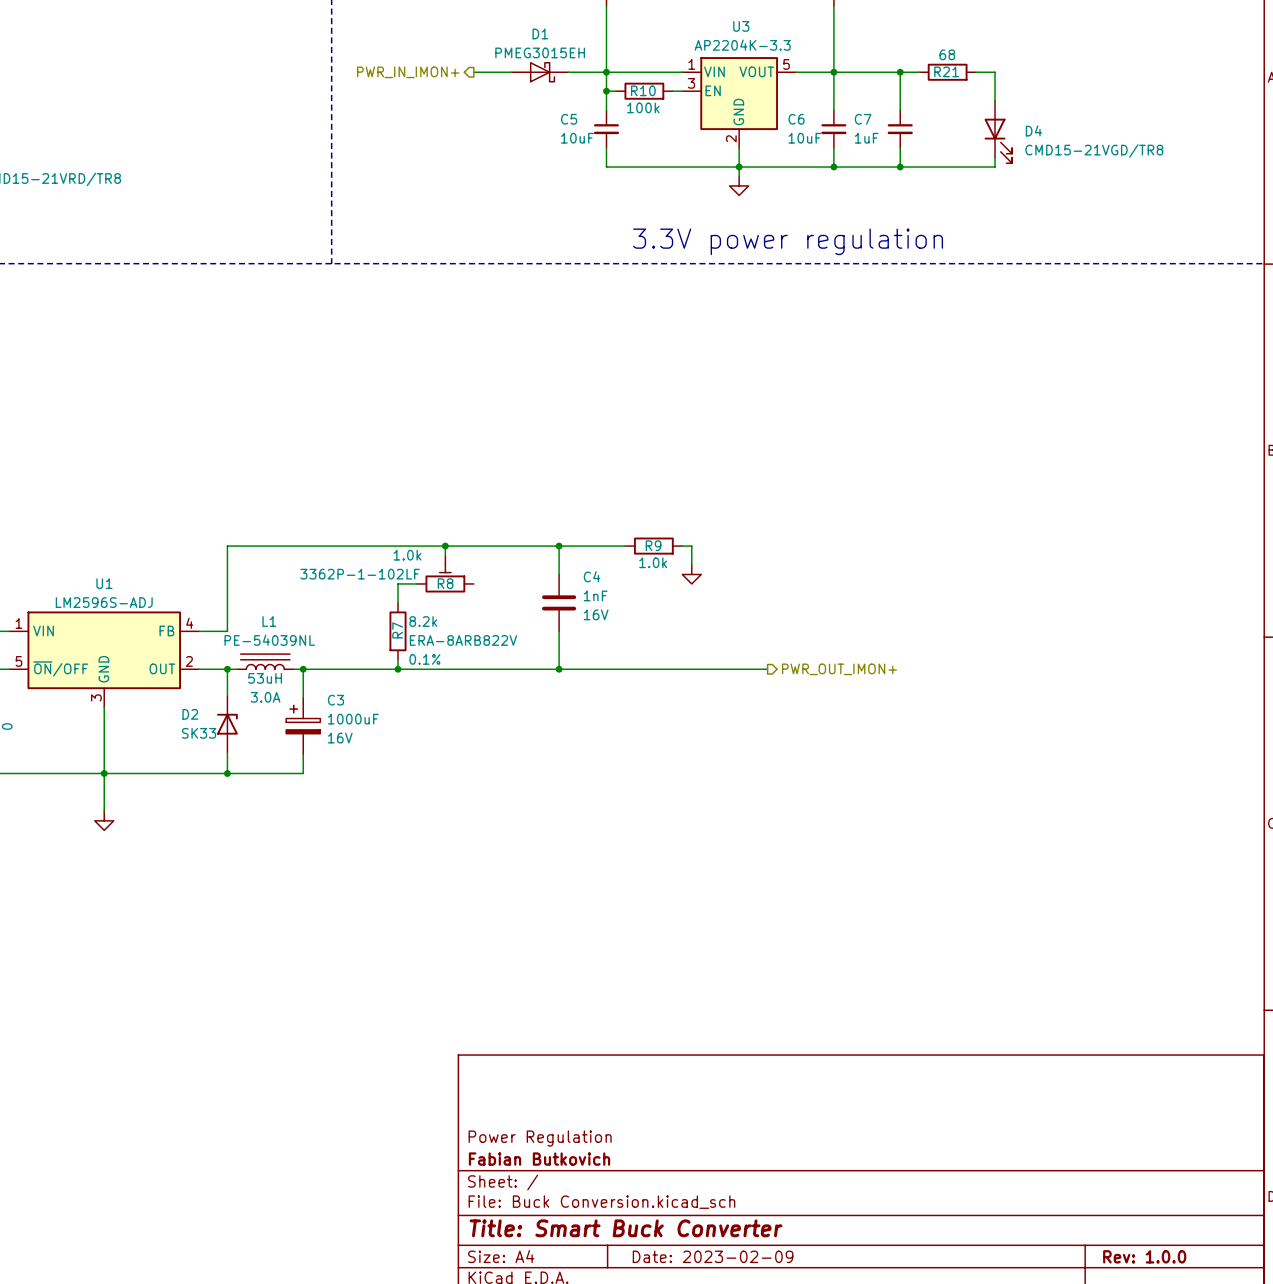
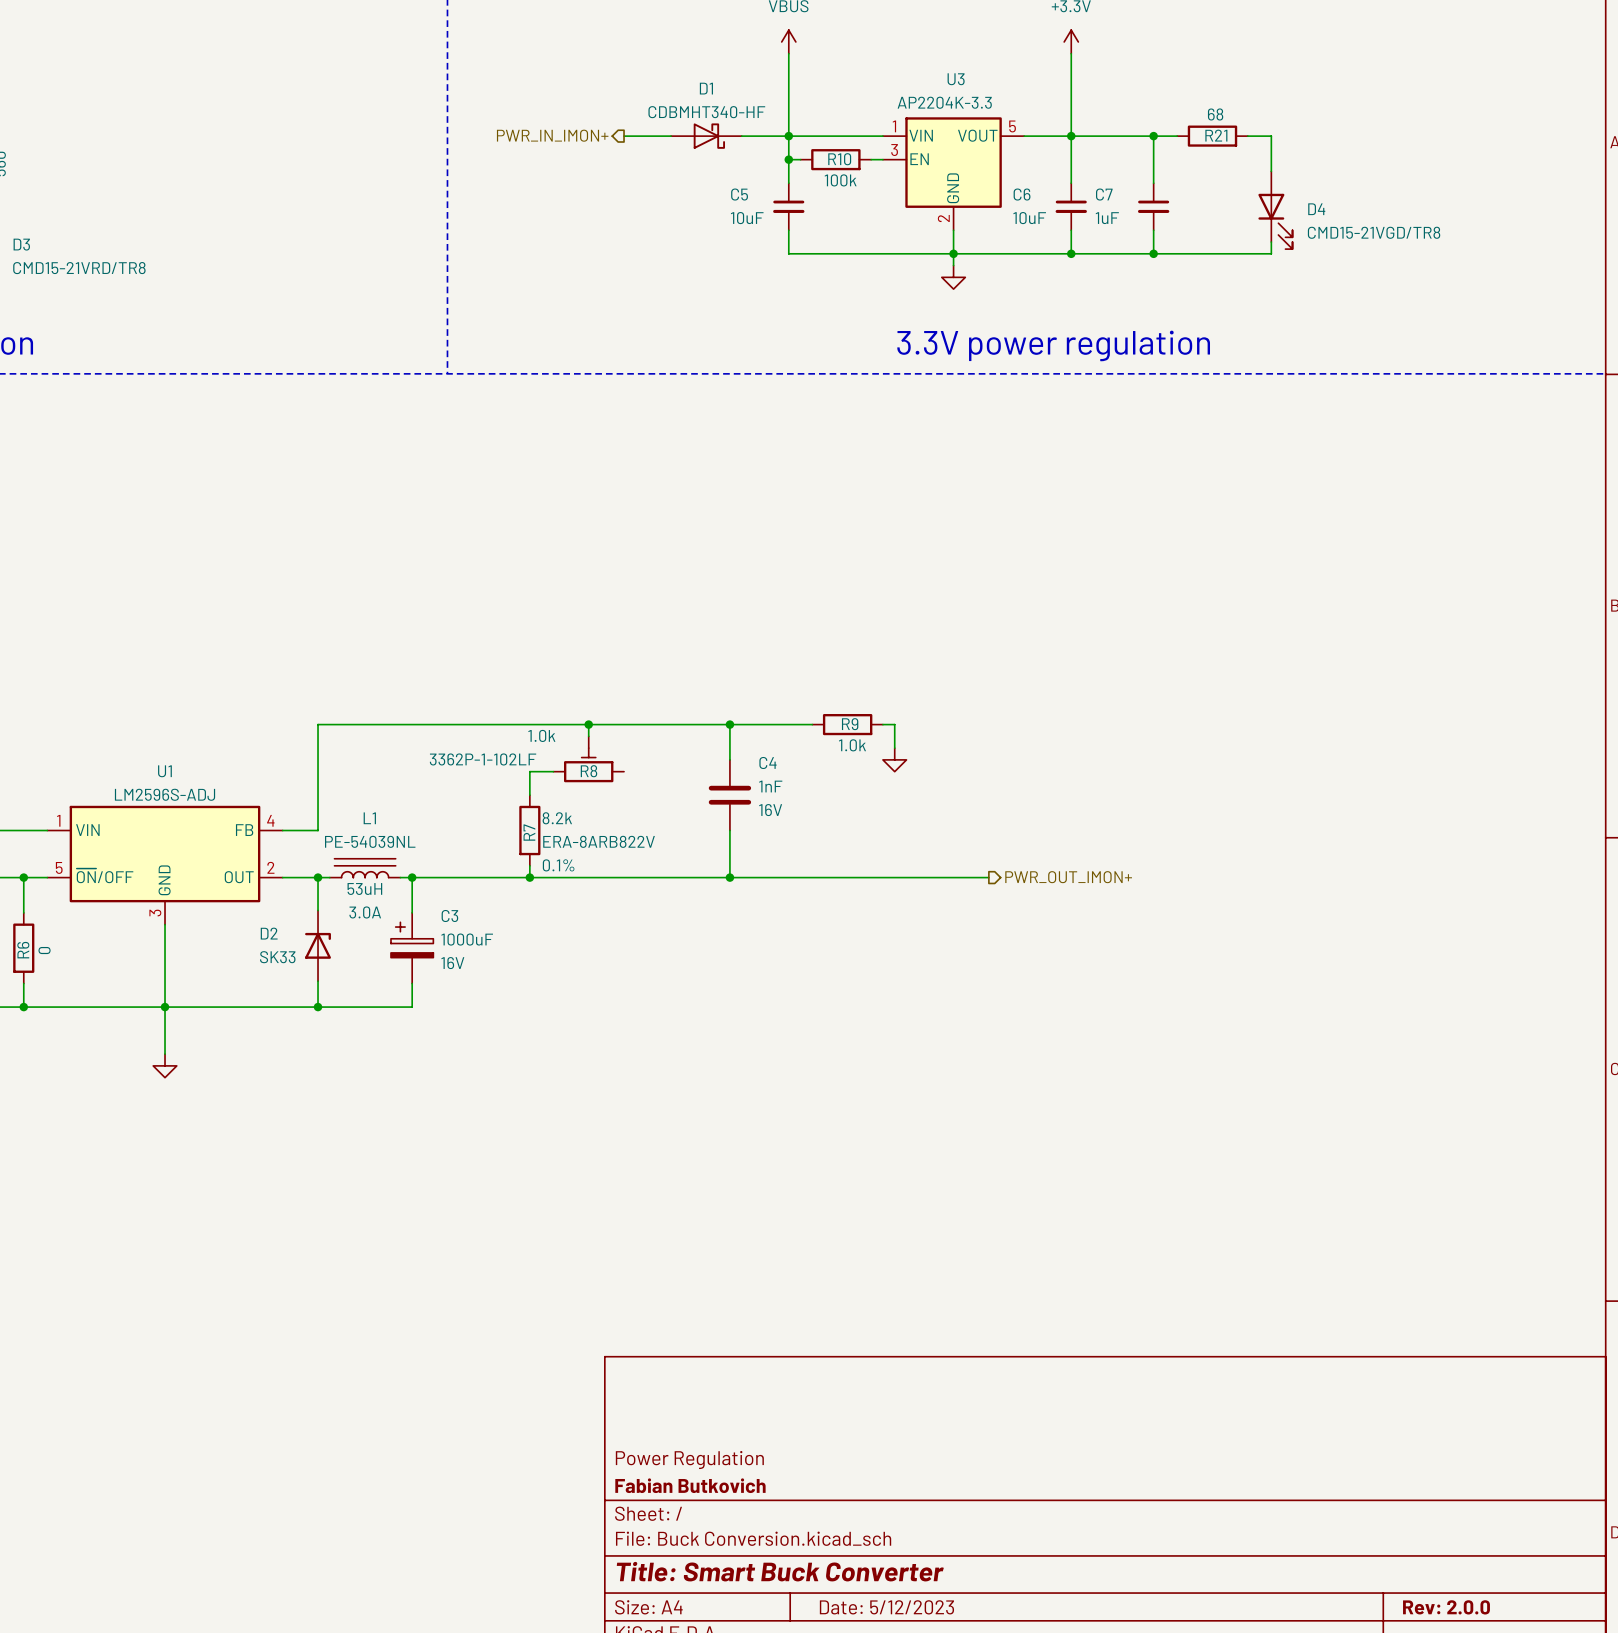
D1 value: PMEG3015EH (540, 52) -> CDBMHT340-HF (706, 112)
title block: Date: 2023-02-09 (713, 1256) -> Date: 5/12/2023 (886, 1607)
title block: Rev: 1.0.0 (1144, 1256) -> Rev: 2.0.0 (1446, 1607)

